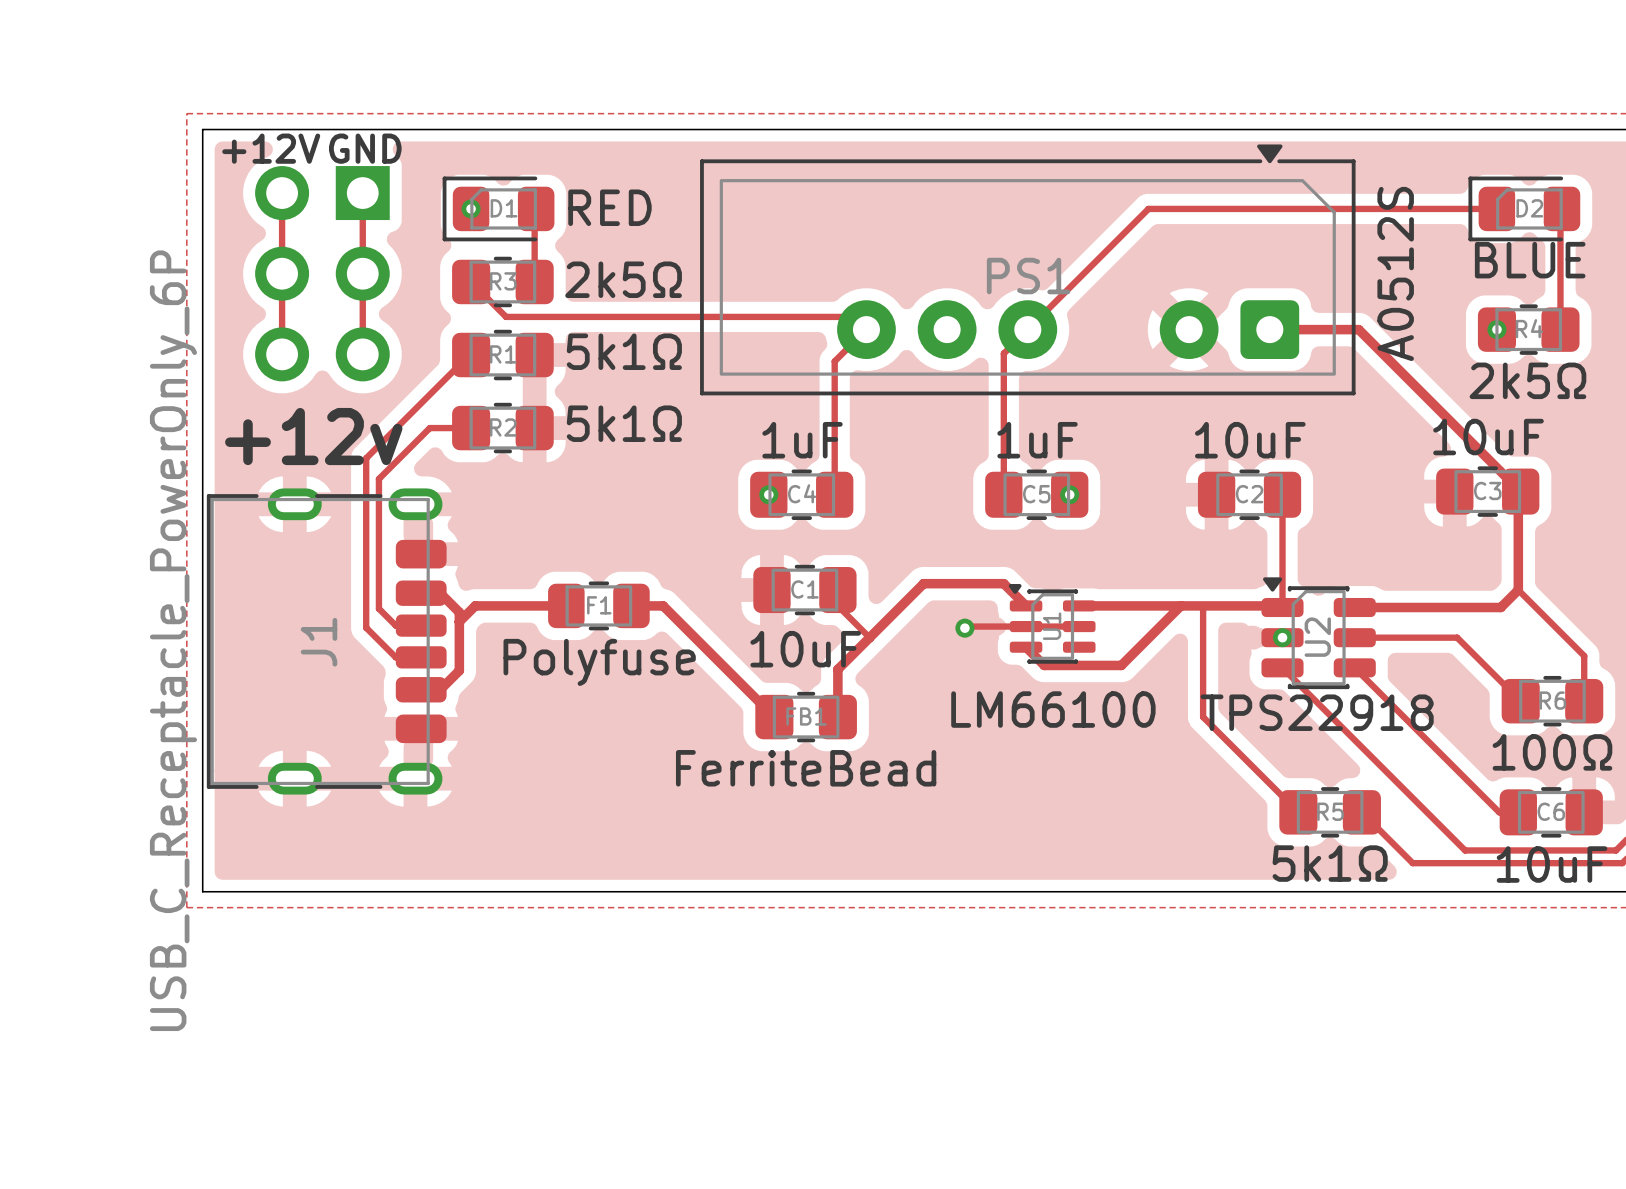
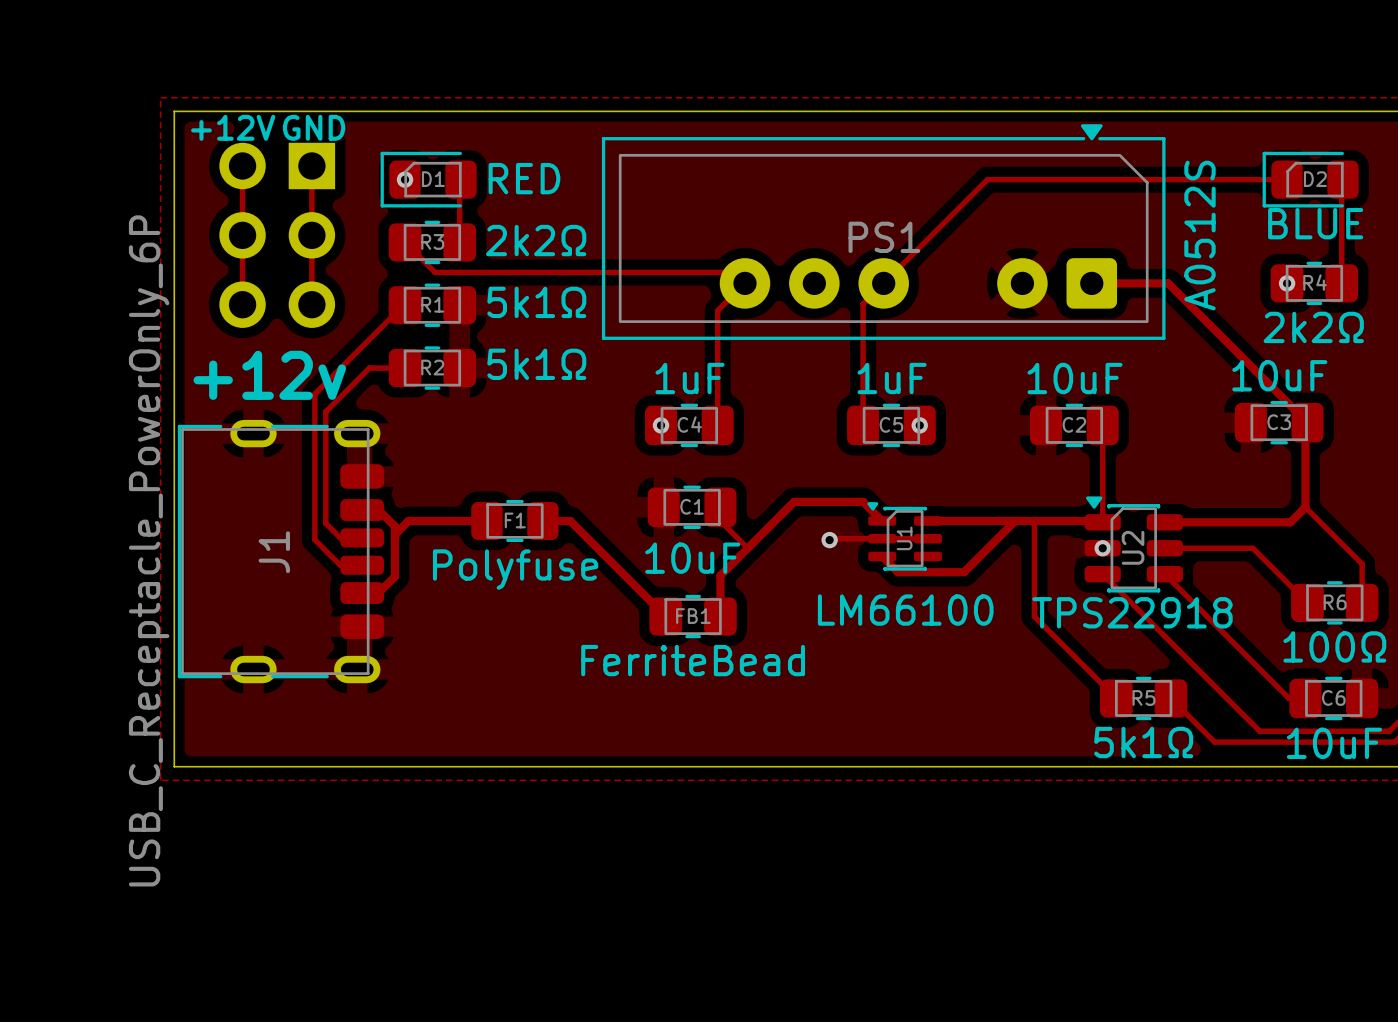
R3 value: 2k5Ω (623, 279) -> 2k2Ω (536, 240)
R4 value: 2k5Ω (1527, 380) -> 2k2Ω (1313, 327)

